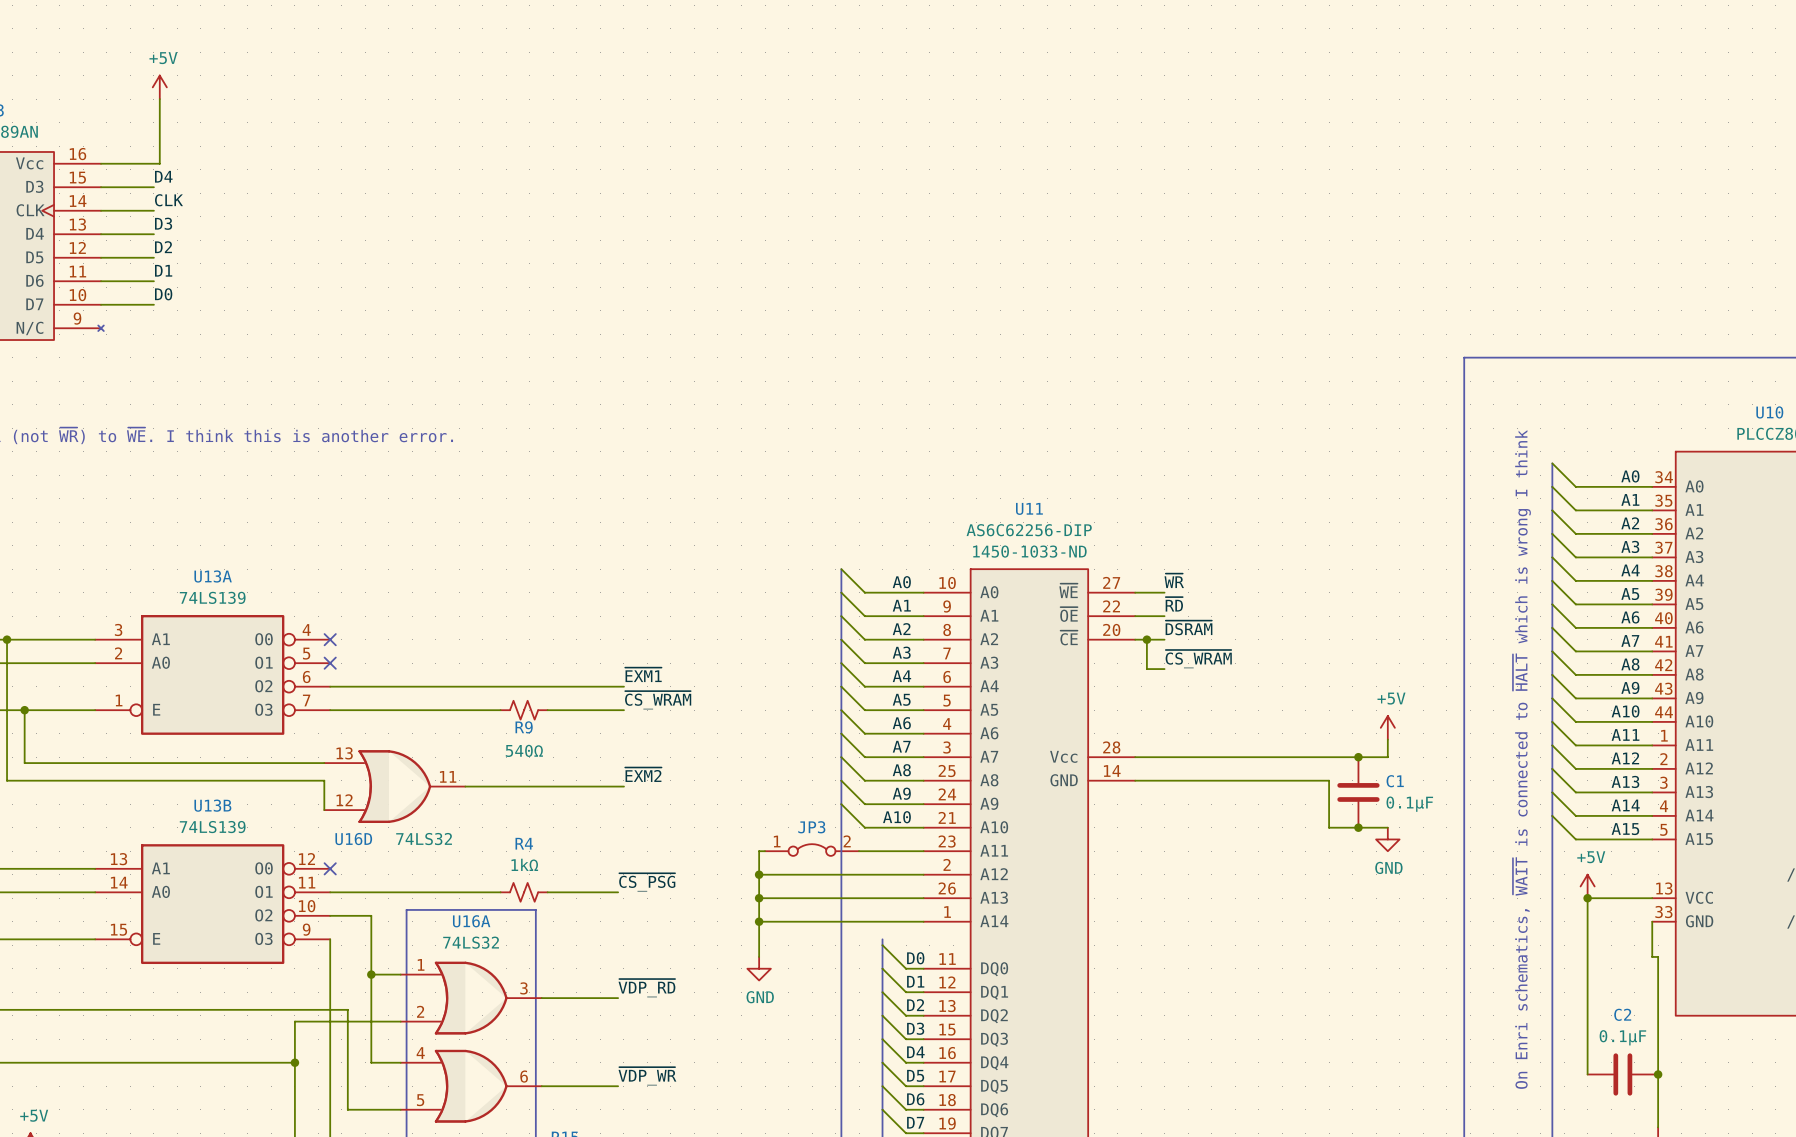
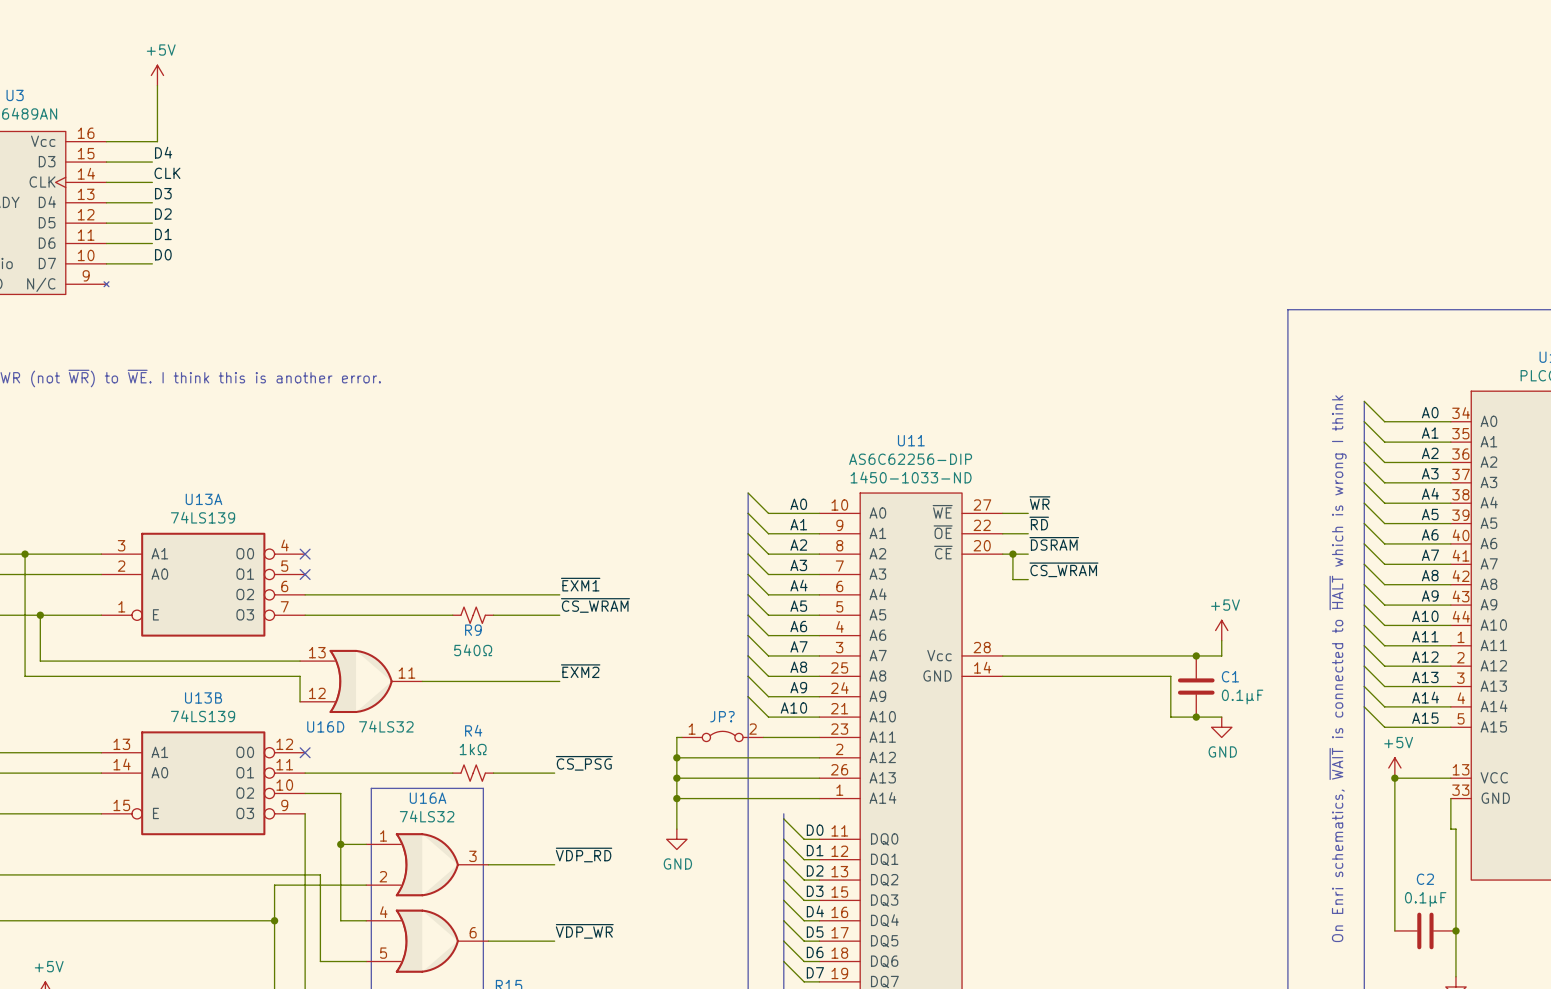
JP3 name: JP3 (811, 827) -> JP? (722, 716)

